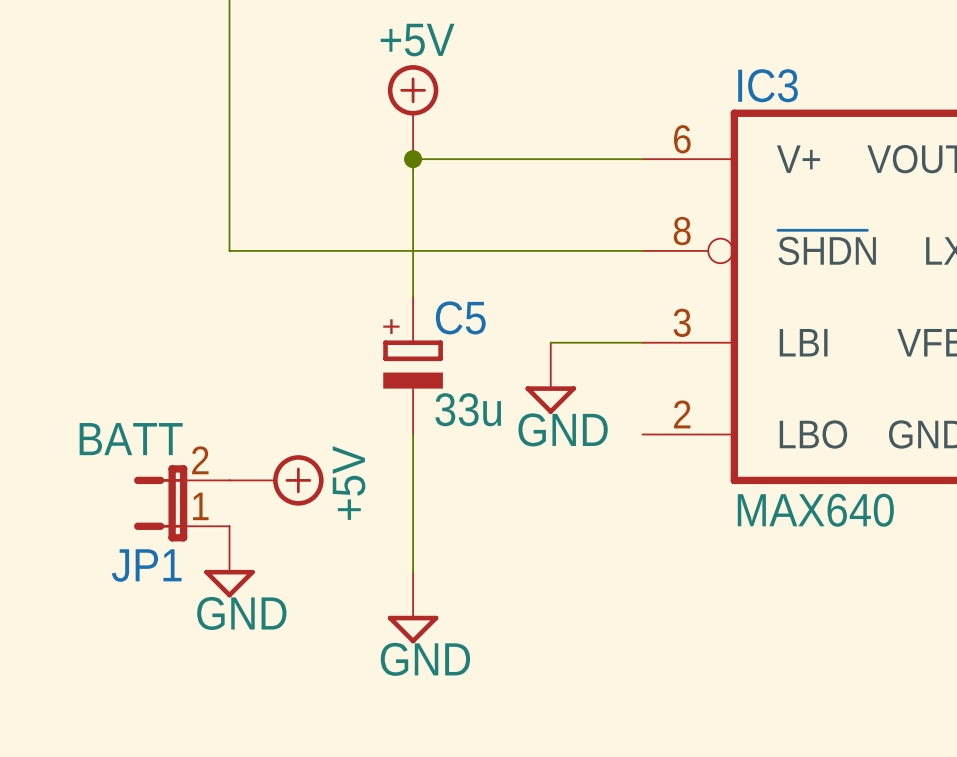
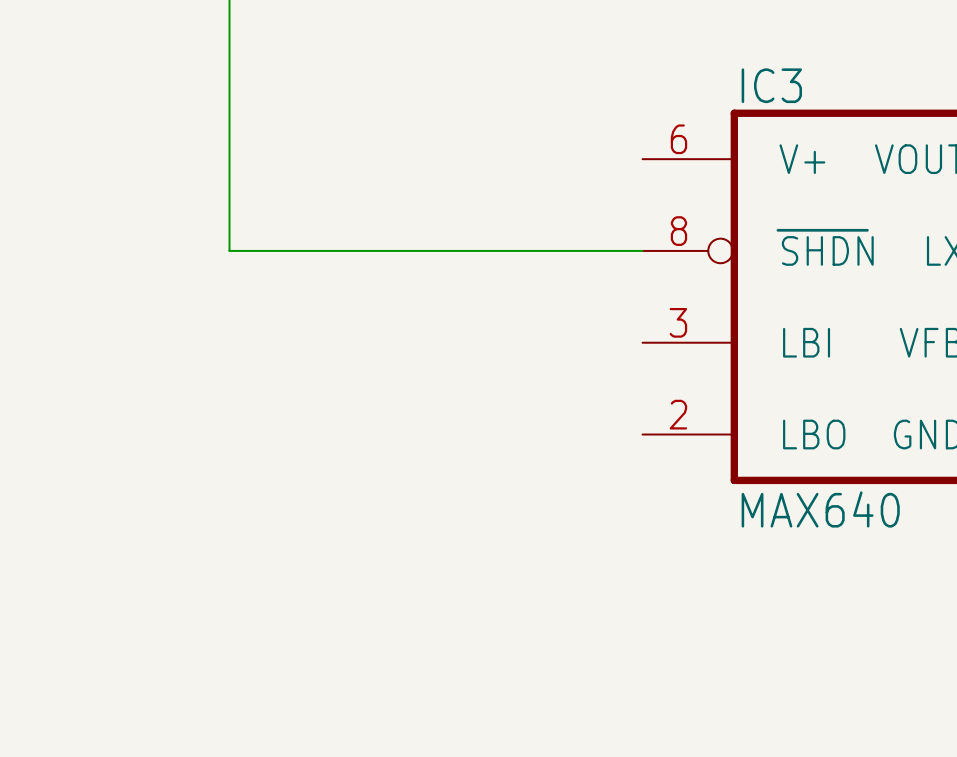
power symbol: +5V (413, 112) -> none
junction: (413, 159) -> none
wire: (642, 159) (413, 159) (413, 296) -> none
wire: (550, 342) (642, 342) -> none
C5: 33u (413, 365) -> none
power symbol: GND (550, 378) -> none
wire: (413, 434) (413, 572) -> none
power symbol: +5V (276, 480) -> none
JP1: BATT (181, 503) -> none
power symbol: GND (229, 561) -> none
power symbol: GND (413, 607) -> none

